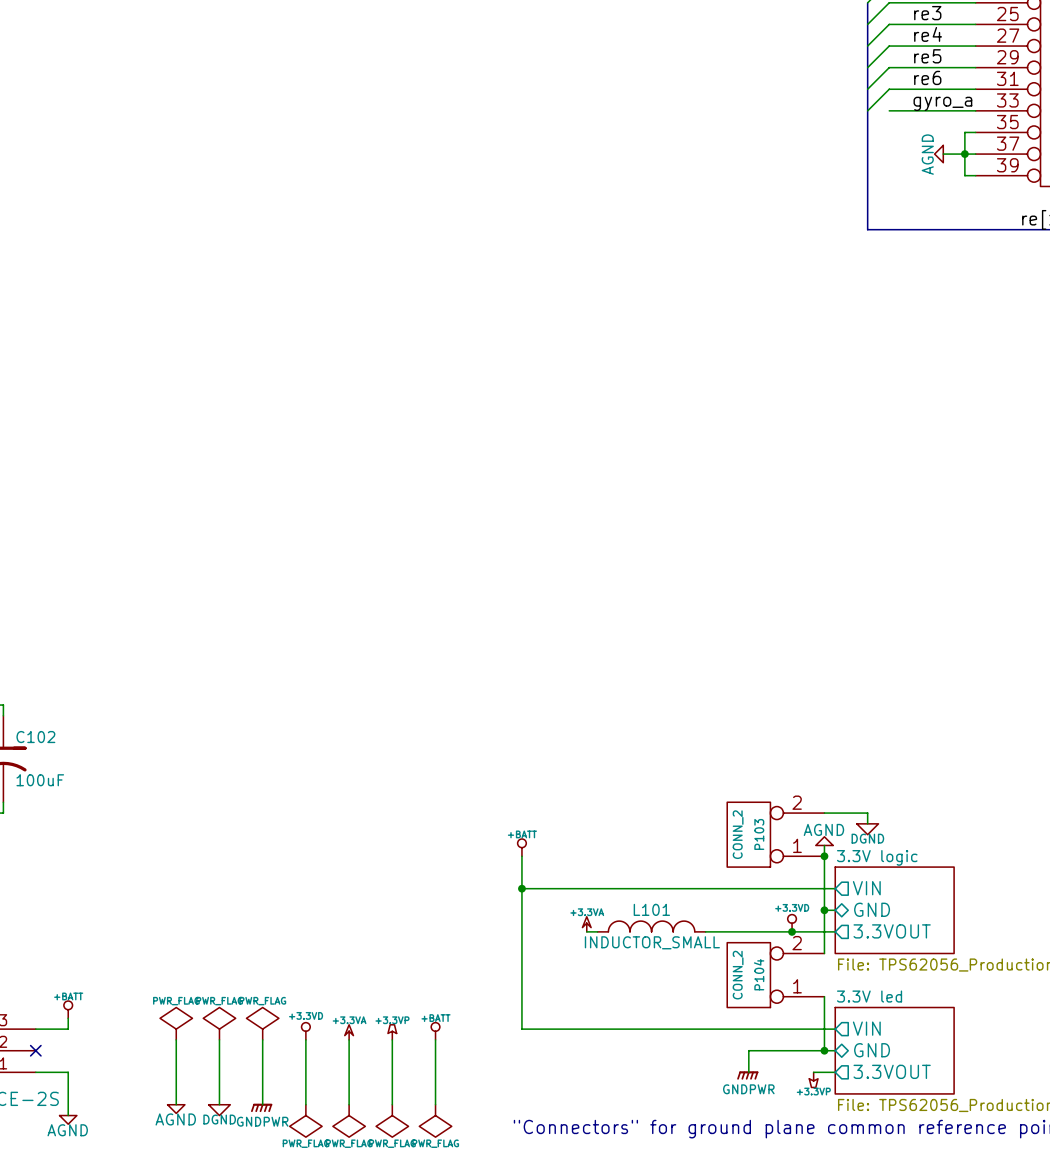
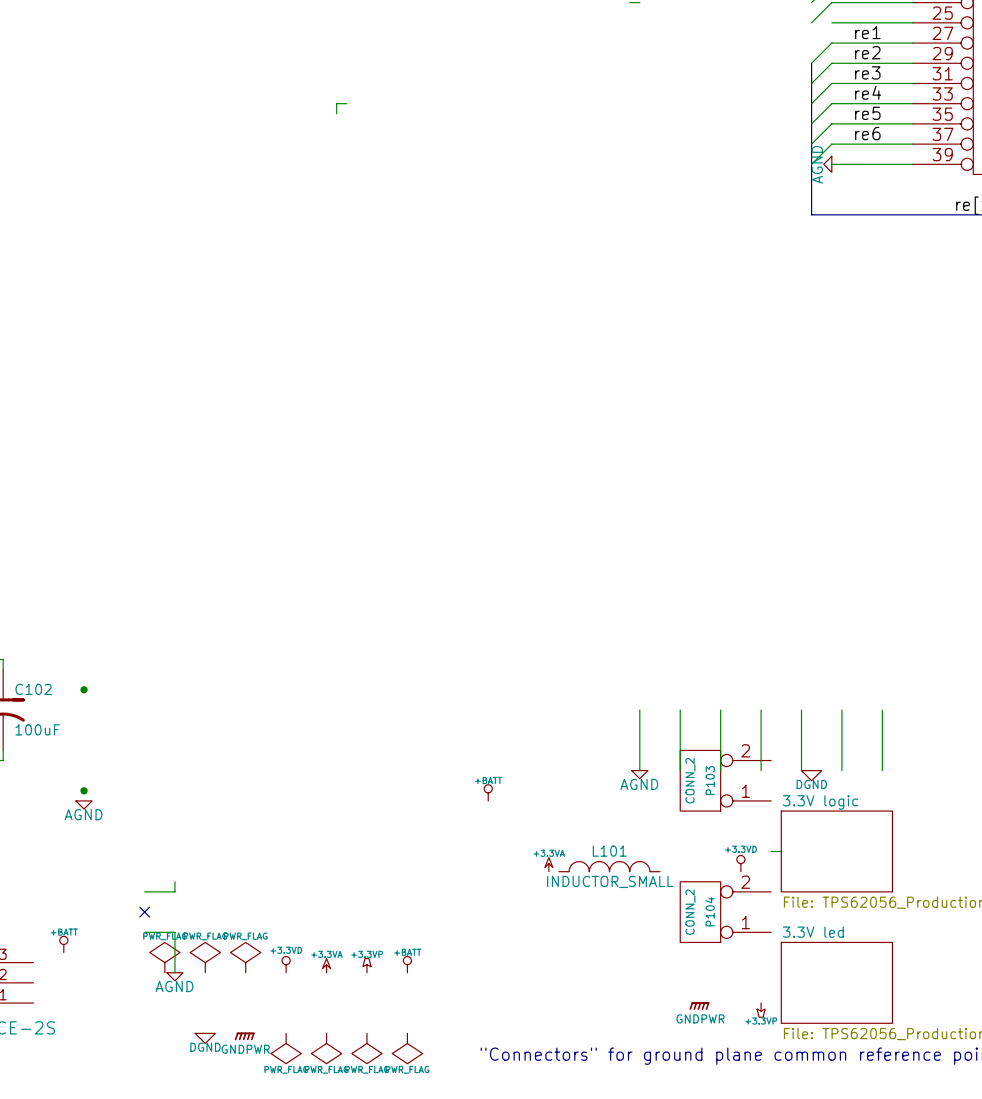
wire: none -> (629, 2) (639, 2)
bus: (867, 2) (867, 67) -> none
label: re3 (927, 13) -> none
wire: (889, 24) (867, 46) -> (831, 103) (811, 123)
label: re4 (928, 34) -> re1 (867, 32)
label: re5 (927, 56) -> re2 (867, 52)
label: re6 (927, 77) -> re3 (867, 72)
label: gyro_a (942, 103) -> re4 (868, 92)
wire: none -> (346, 103) (336, 103) (336, 113)
label: none -> re5 (867, 113)
wire: (964, 132) (964, 175) -> (831, 164) (902, 164)
wire: none -> (902, 123) (831, 123) (811, 144)
label: none -> re6 (867, 133)
power symbol position: AGND (938, 154) -> AGND (827, 164)
wire: none -> (882, 144) (831, 144) (811, 164)
junction: (964, 154) -> none
junction: none -> (84, 689)
wire: none -> (639, 710) (639, 770)
wire: none -> (680, 710) (680, 770)
wire: none -> (720, 710) (720, 770)
wire: none -> (761, 710) (761, 770)
wire: none -> (801, 710) (801, 770)
wire: none -> (841, 710) (841, 770)
wire: none -> (882, 710) (882, 770)
wire: (824, 813) (867, 813) (867, 823) -> none
power symbol rotation: 0° (824, 841) -> 180° (639, 774)
power symbol position: AGND (824, 841) -> AGND (639, 774)
junction: none -> (84, 790)
wire: (824, 845) (824, 953) -> none
wire: (521, 856) (521, 1029) (835, 1029) -> none
junction: (824, 856) -> none
power symbol: none -> AGND (84, 804)
wire: (521, 888) (835, 888) -> none
junction: (521, 888) -> none
sheet pin: VIN (866, 888) -> none
sheet pin: GND (872, 909) -> none
junction: (824, 910) -> none
wire: (586, 931) (597, 931) -> none
wire: (705, 931) (835, 931) -> none
junction: (792, 931) -> none
sheet pin: 3.3VOUT (892, 931) -> none
no-connect mark: none -> (144, 912)
wire: (824, 996) (824, 1050) -> none
wire: (68, 1018) (68, 1029) (35, 1029) -> (174, 881) (174, 891) (144, 891)
sheet pin: VIN (866, 1028) -> none
wire: (176, 1039) (176, 1104) -> none
wire: (219, 1039) (219, 1104) -> none
wire: (262, 1039) (262, 1104) -> none
wire: (305, 1039) (305, 1104) -> none
wire: (349, 1039) (349, 1104) -> none
wire: (392, 1039) (392, 1104) -> none
wire: (435, 1039) (435, 1104) -> none
no-connect mark: (35, 1050) -> none
junction: (824, 1050) -> none
wire: (835, 1050) (748, 1050) (748, 1072) -> none
sheet pin: GND (872, 1050) -> none
sheet pin: 3.3VOUT (892, 1071) -> none
wire: (35, 1072) (68, 1072) (68, 1115) -> (144, 932) (174, 932) (174, 972)
wire: (813, 1072) (835, 1072) -> none
power symbol position: AGND (176, 1109) -> AGND (174, 976)
power symbol: AGND (68, 1119) -> none

